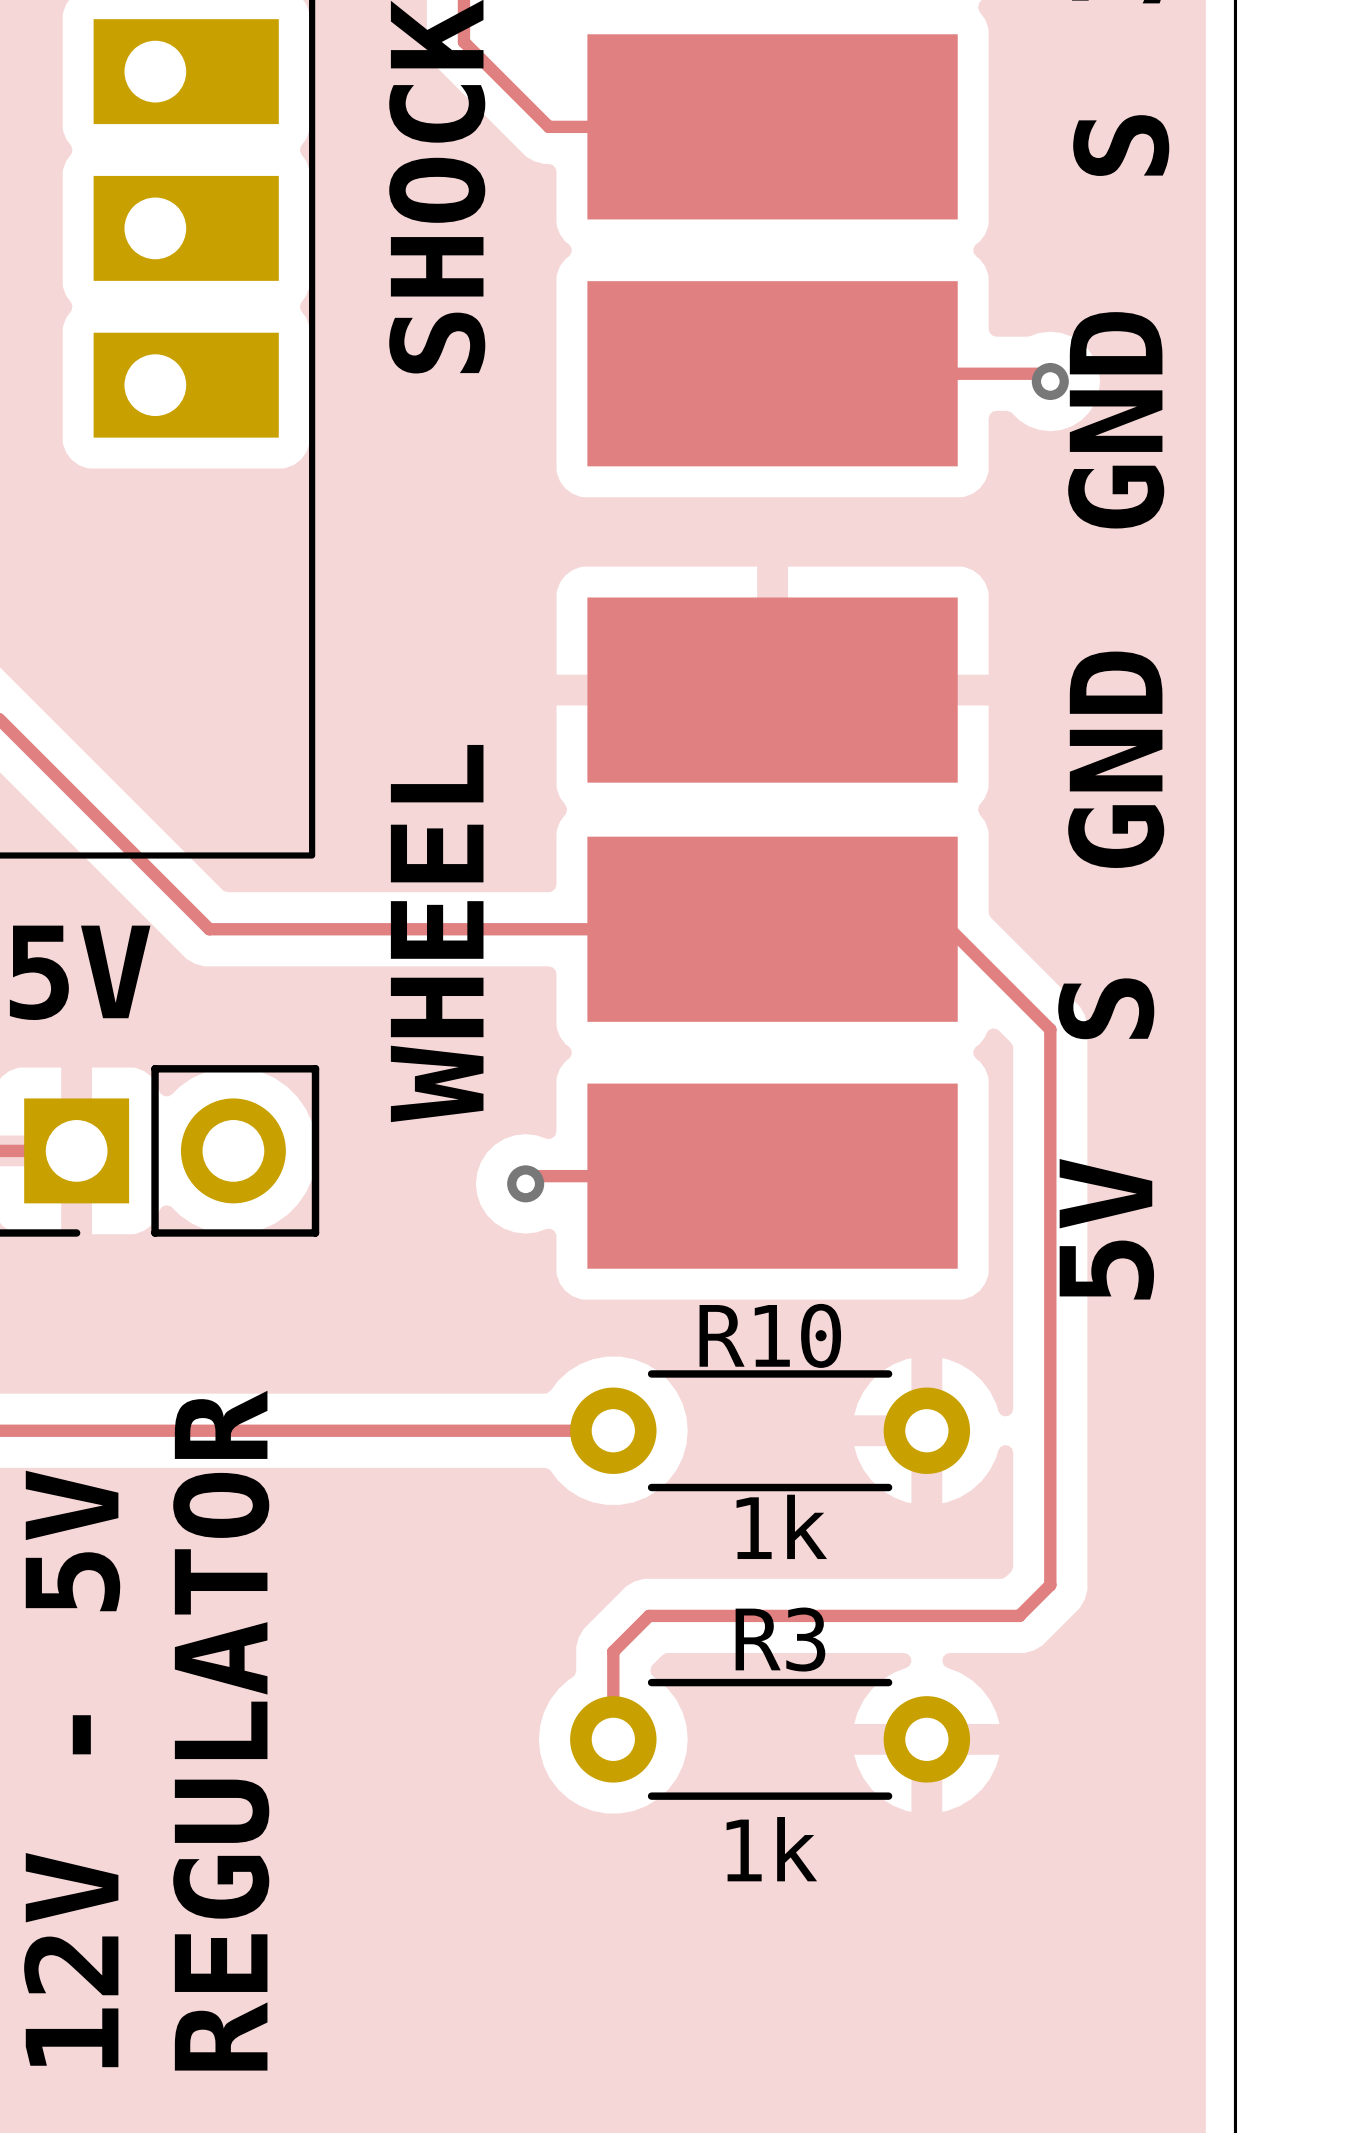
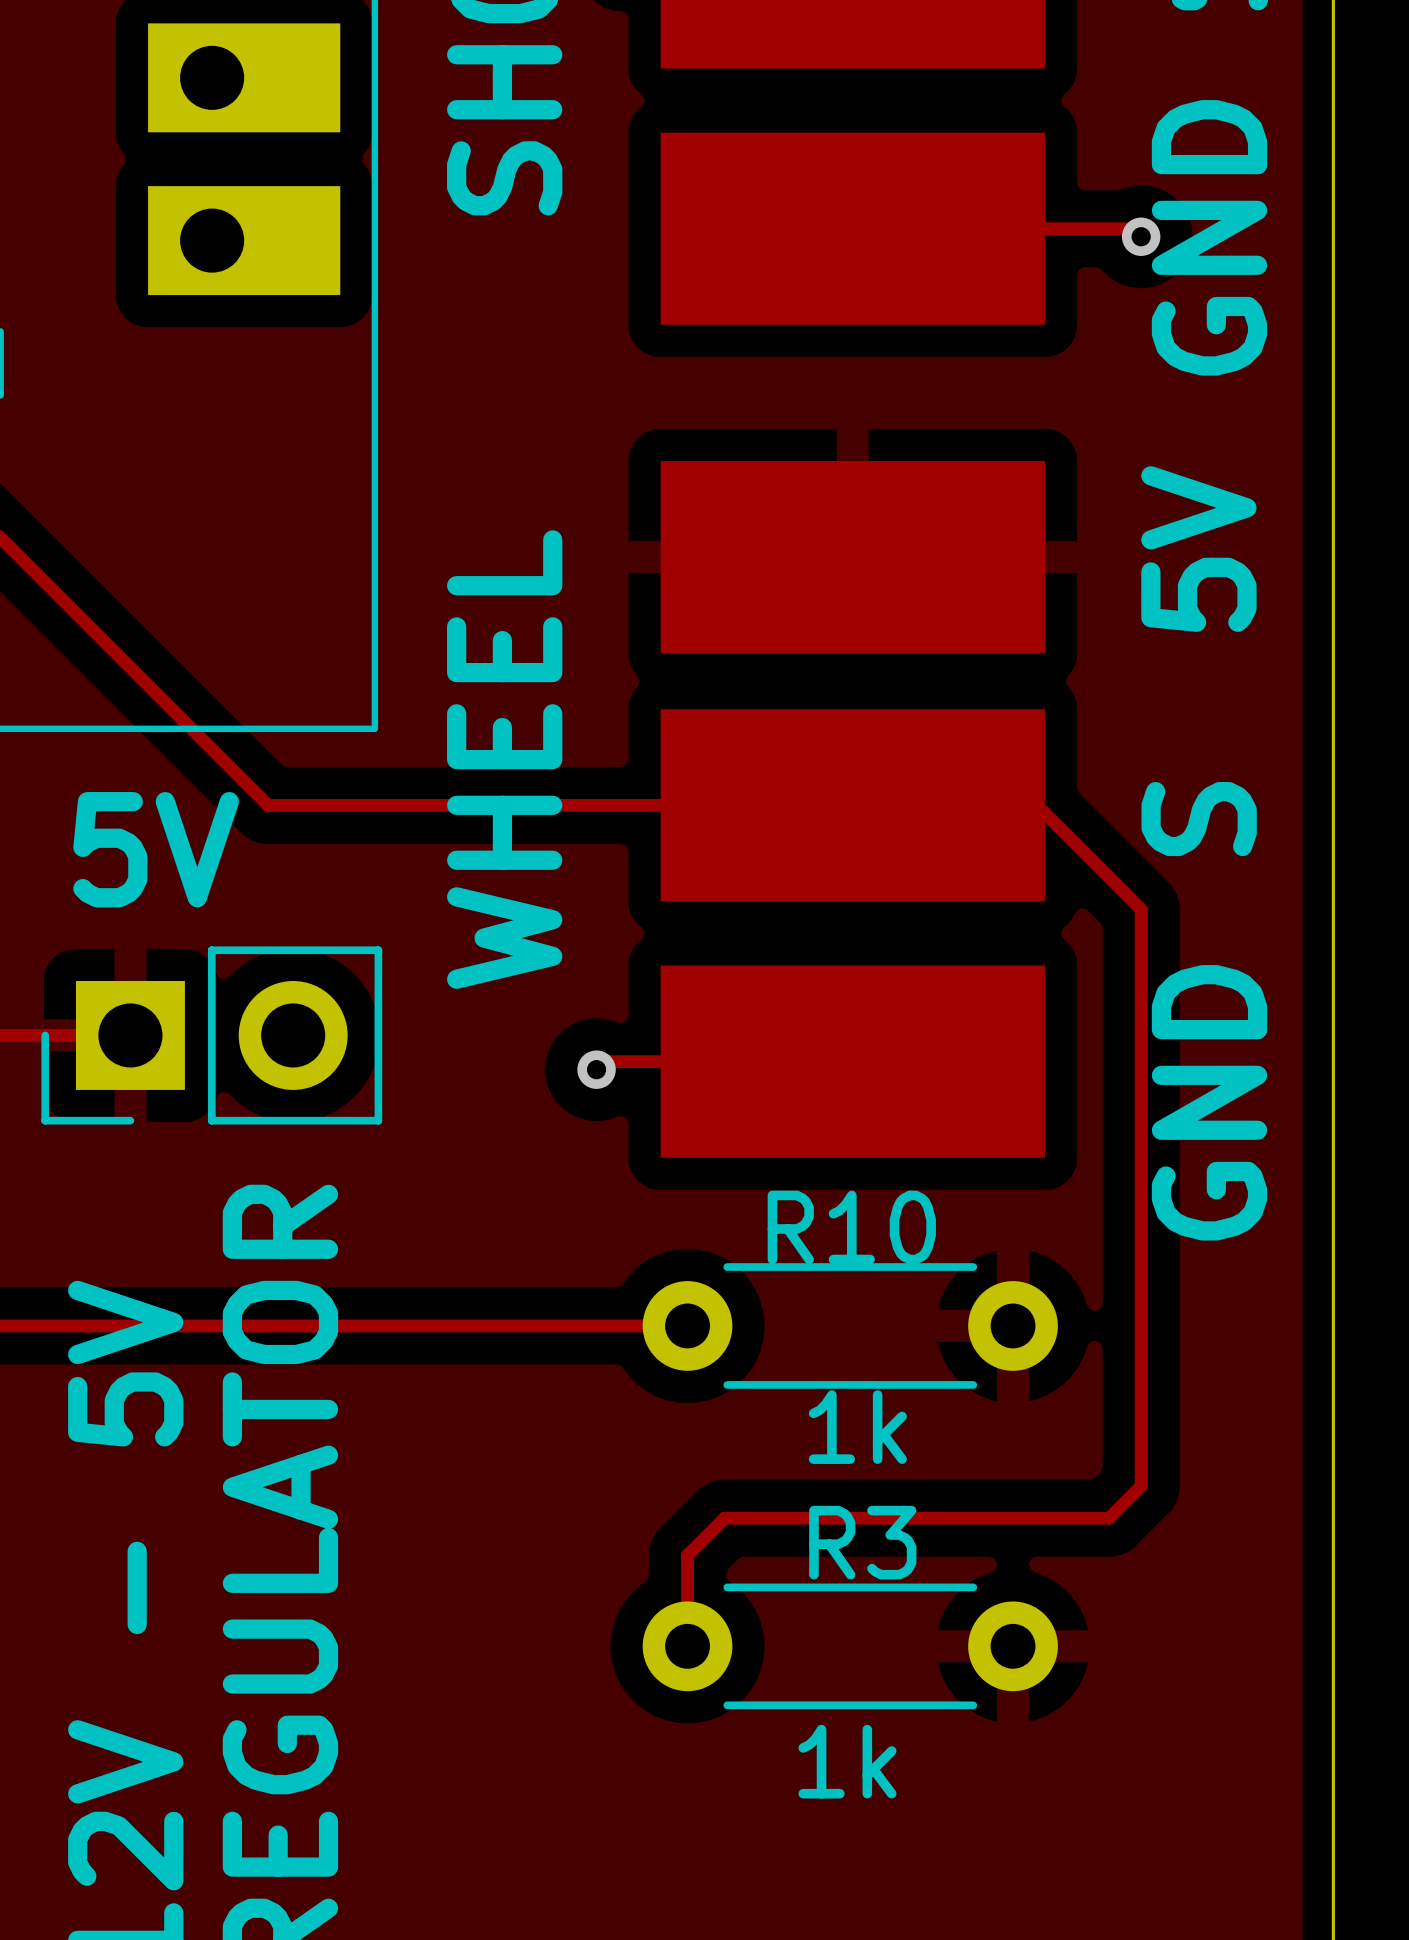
text position: GND (1116, 759) -> GND (1209, 1102)
text position: S (1106, 1008) -> S (1199, 819)
text position: 5V (1106, 1229) -> 5V (1198, 549)

